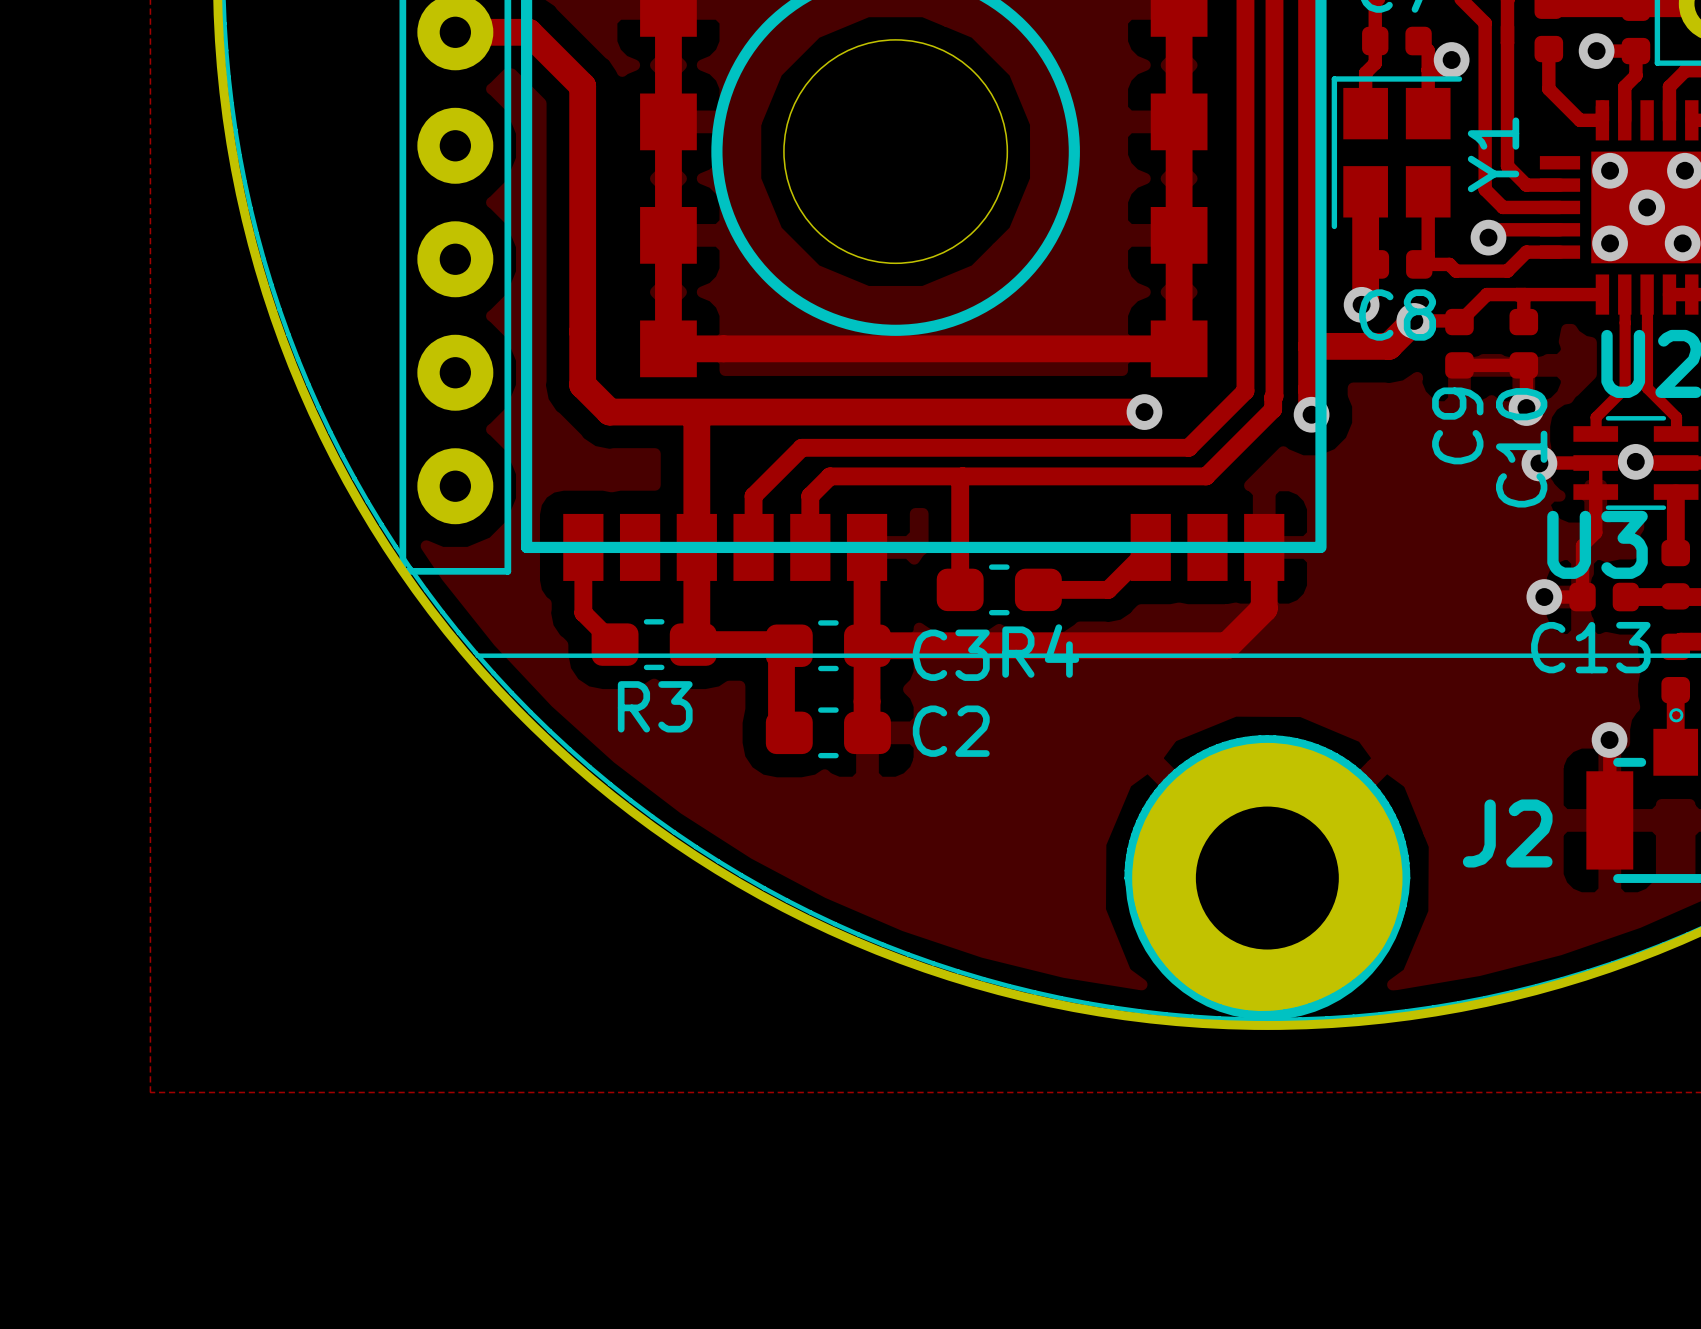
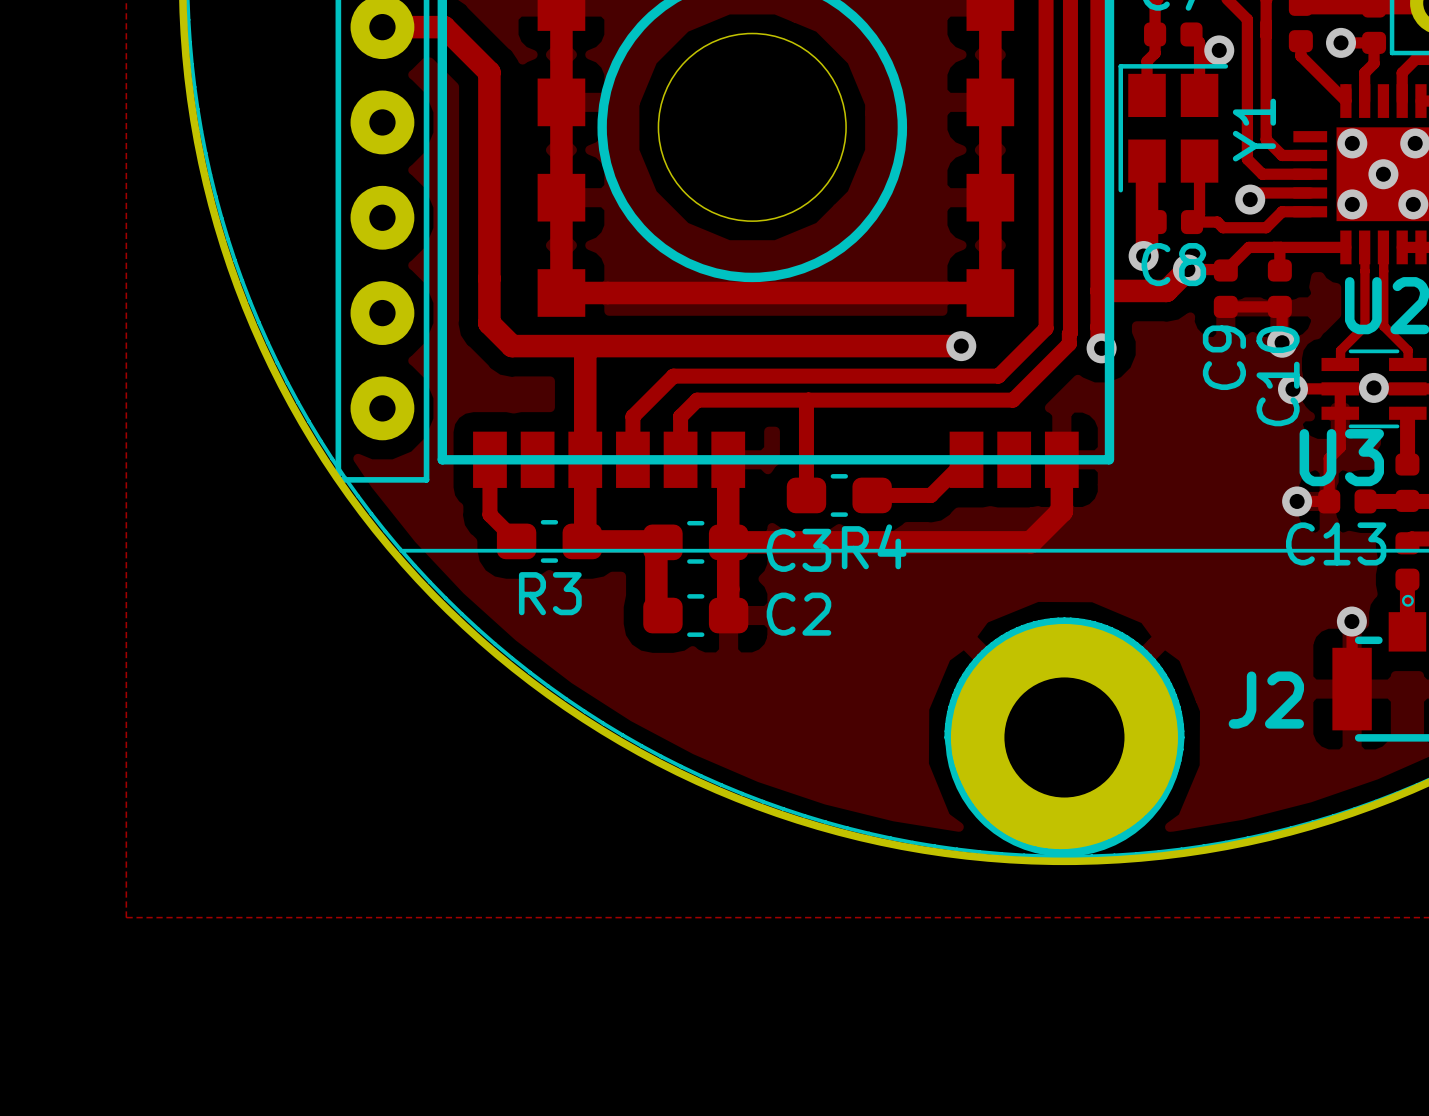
track: (1548, 66) (1548, 89) (1580, 120) (1602, 120) -> (1300, 56) (1345, 101)

